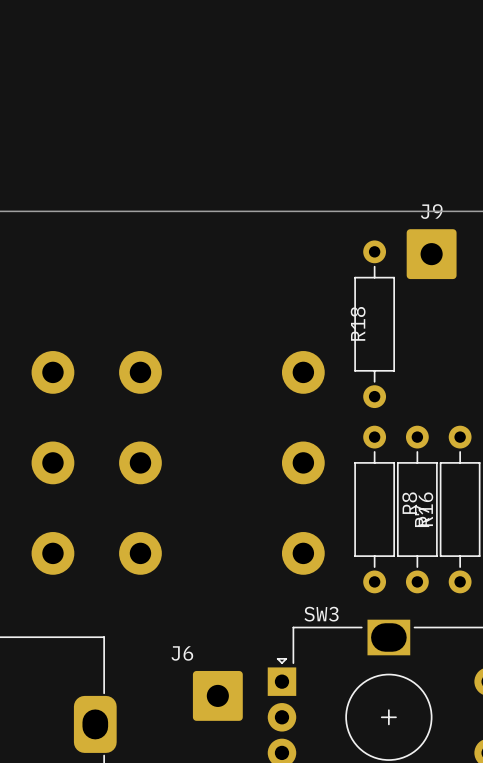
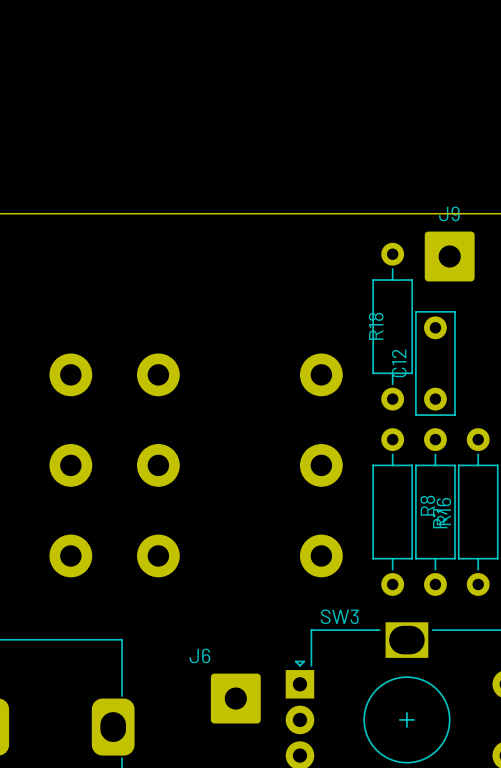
C12: none -> (435, 363)

